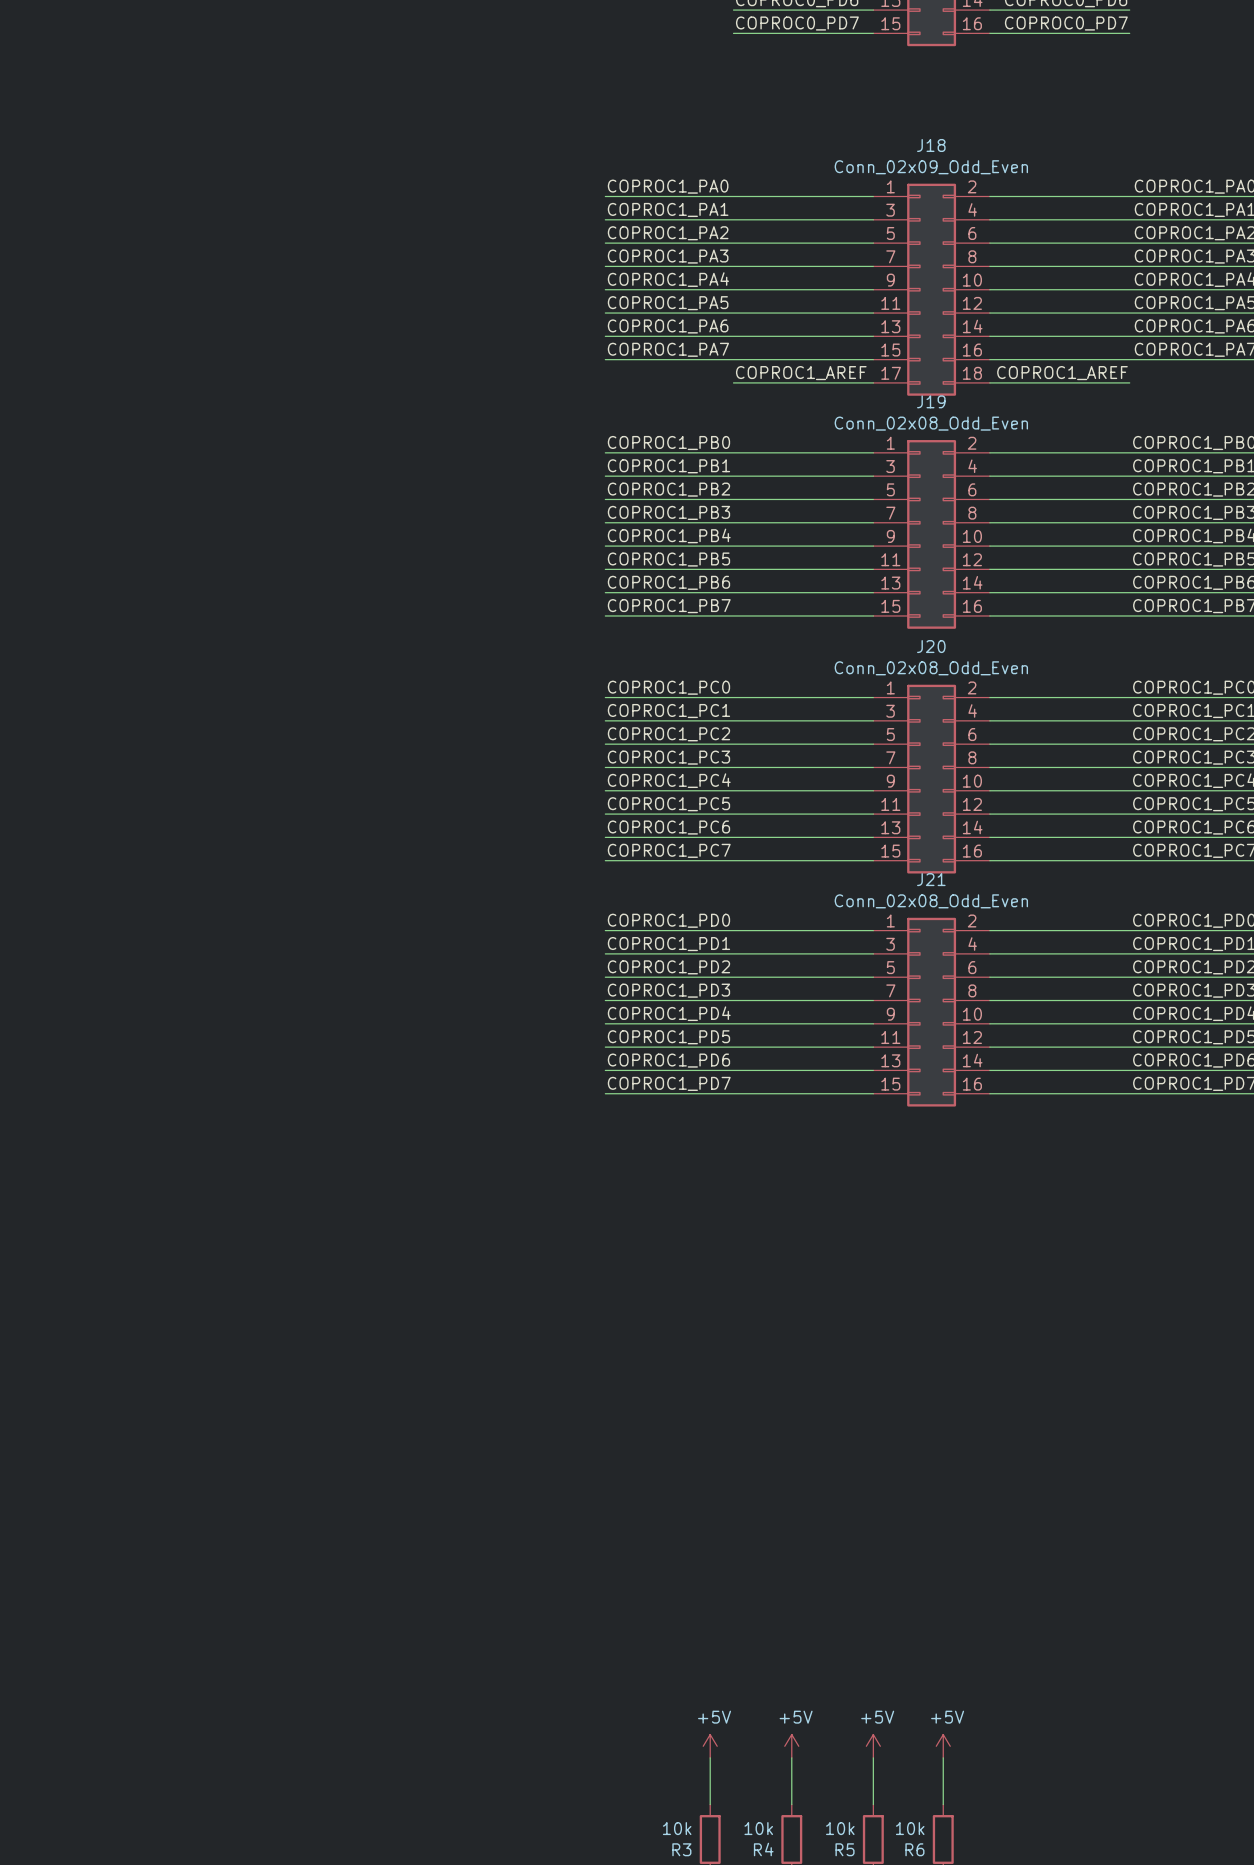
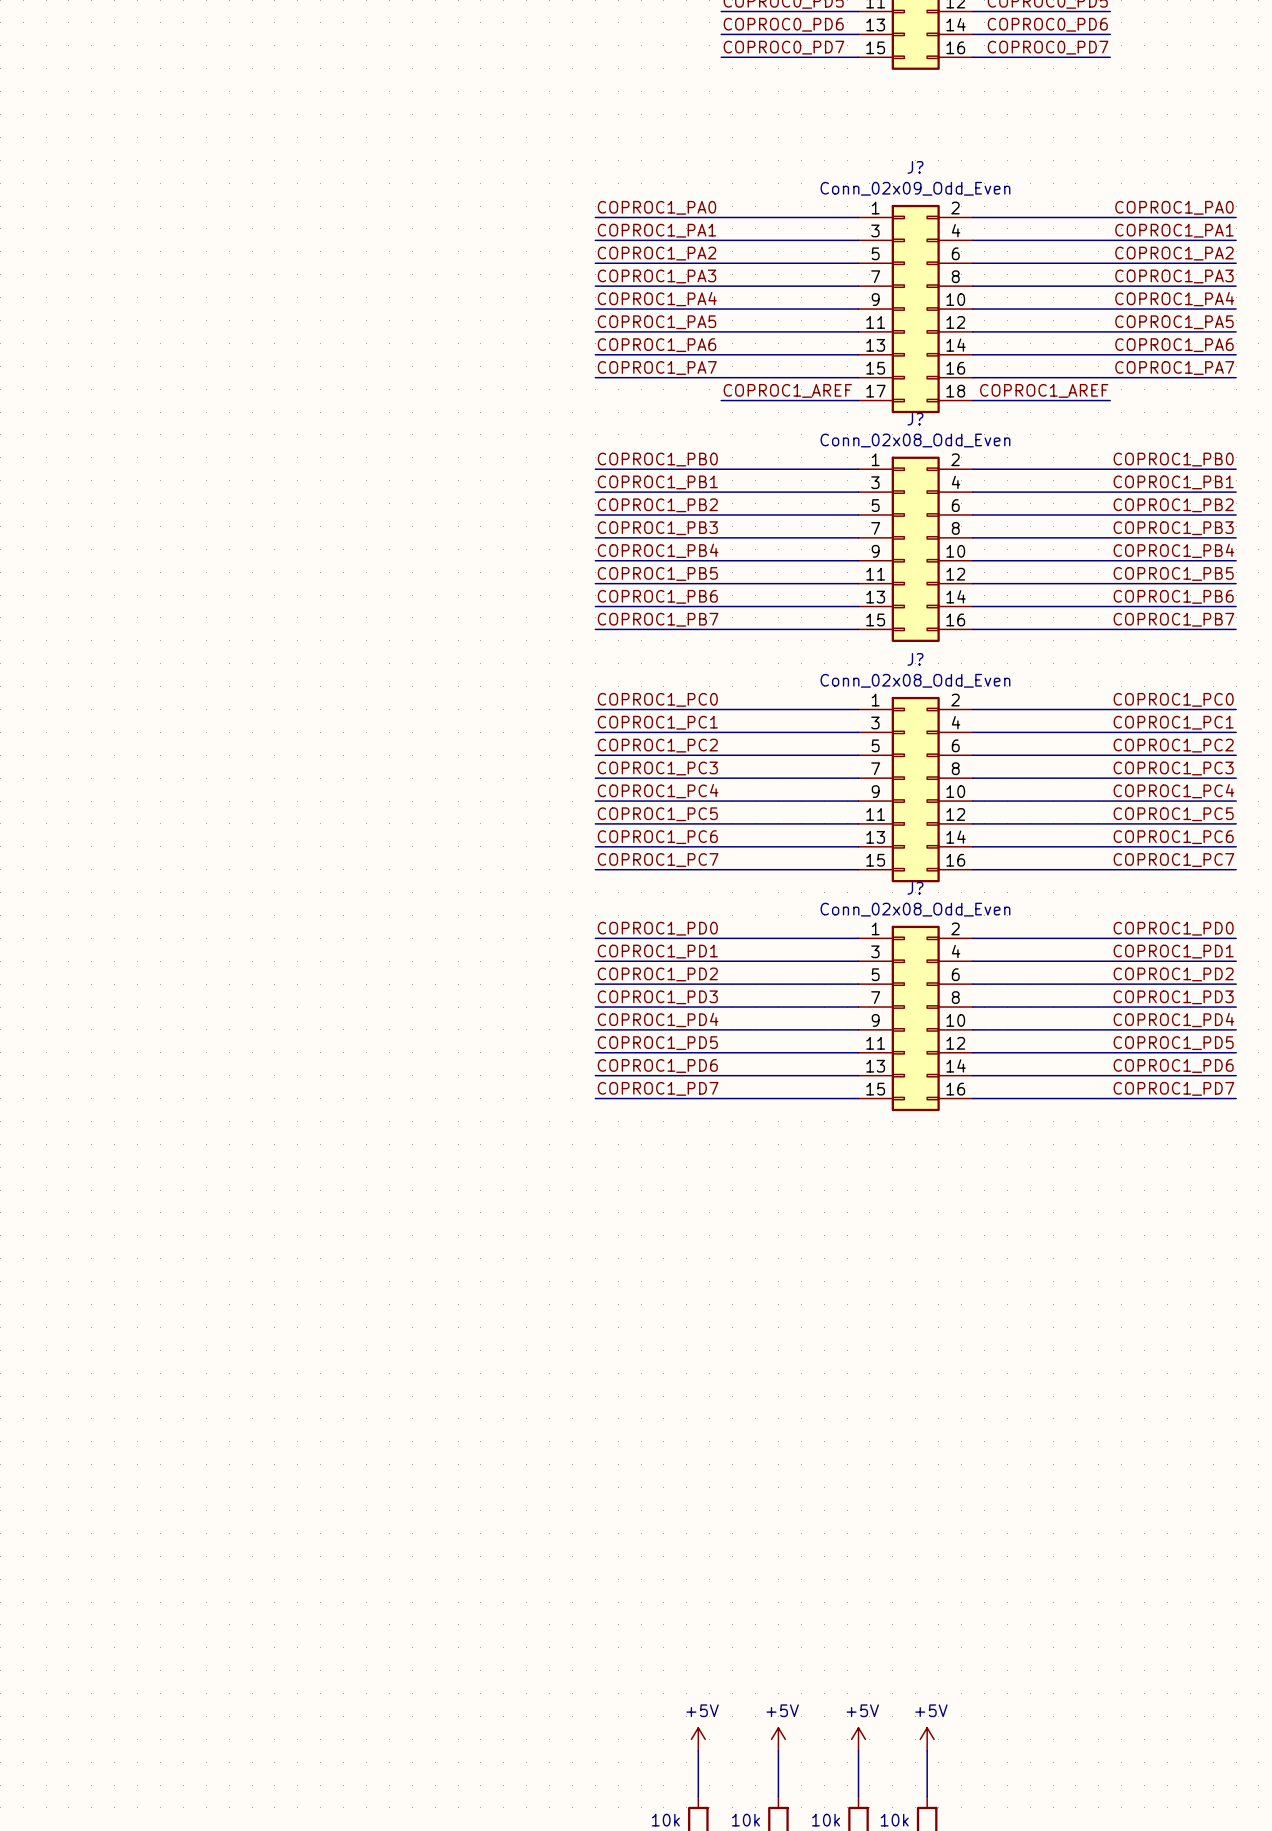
J18 name: J18 (931, 145) -> J? (915, 167)
J19 name: J19 (931, 401) -> J? (915, 419)
J20 name: J20 (931, 646) -> J? (915, 659)
J21 name: J21 (931, 879) -> J? (915, 888)

